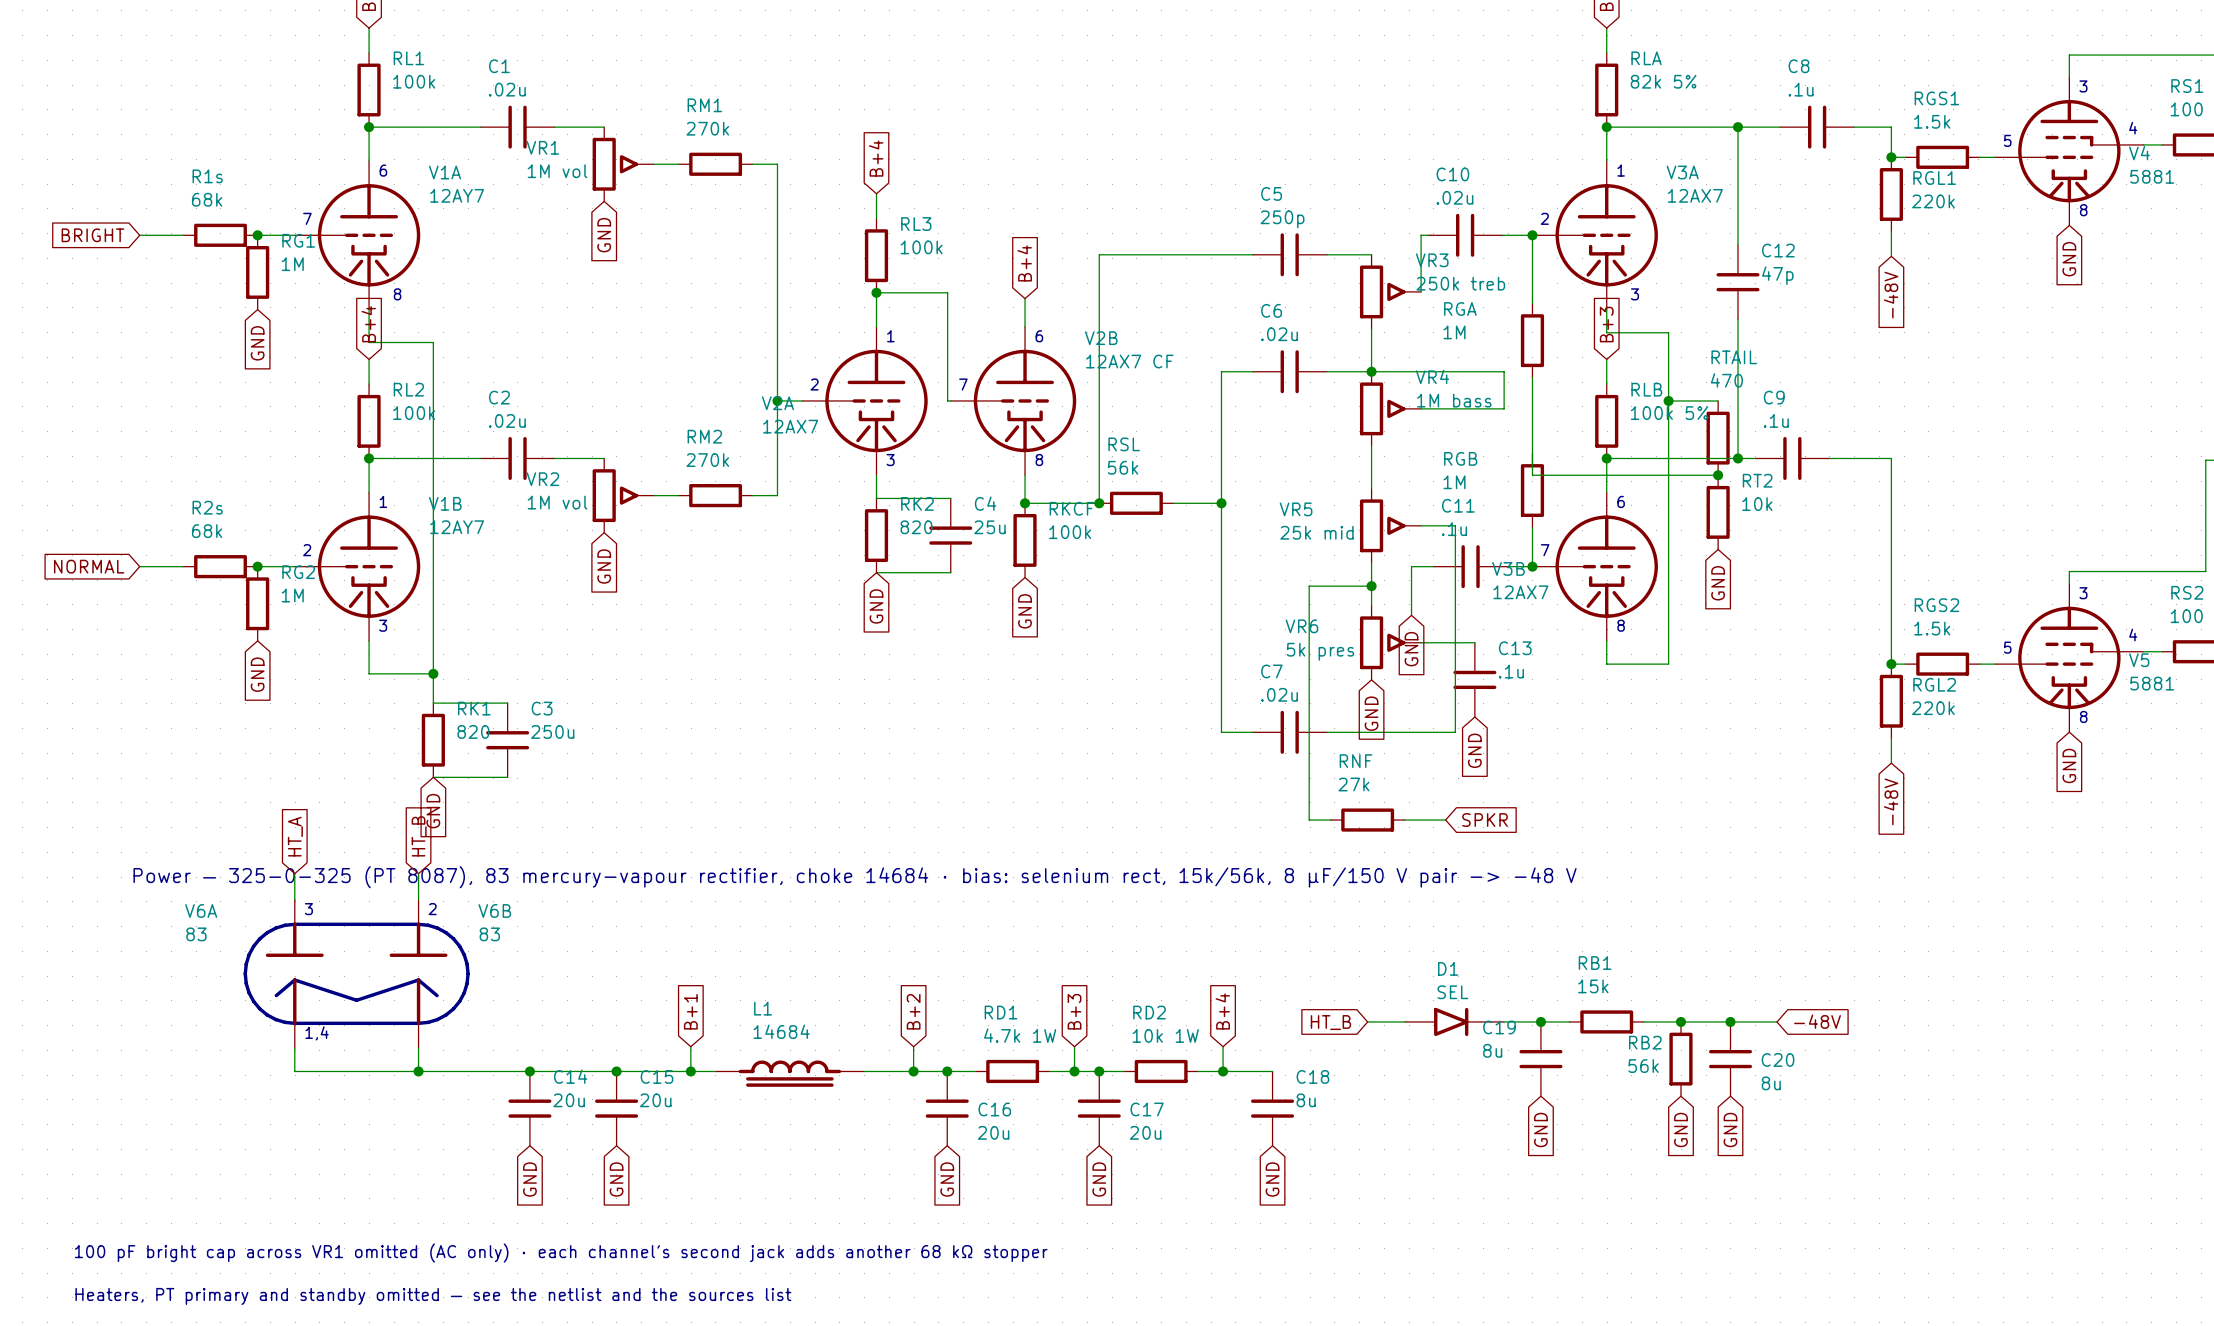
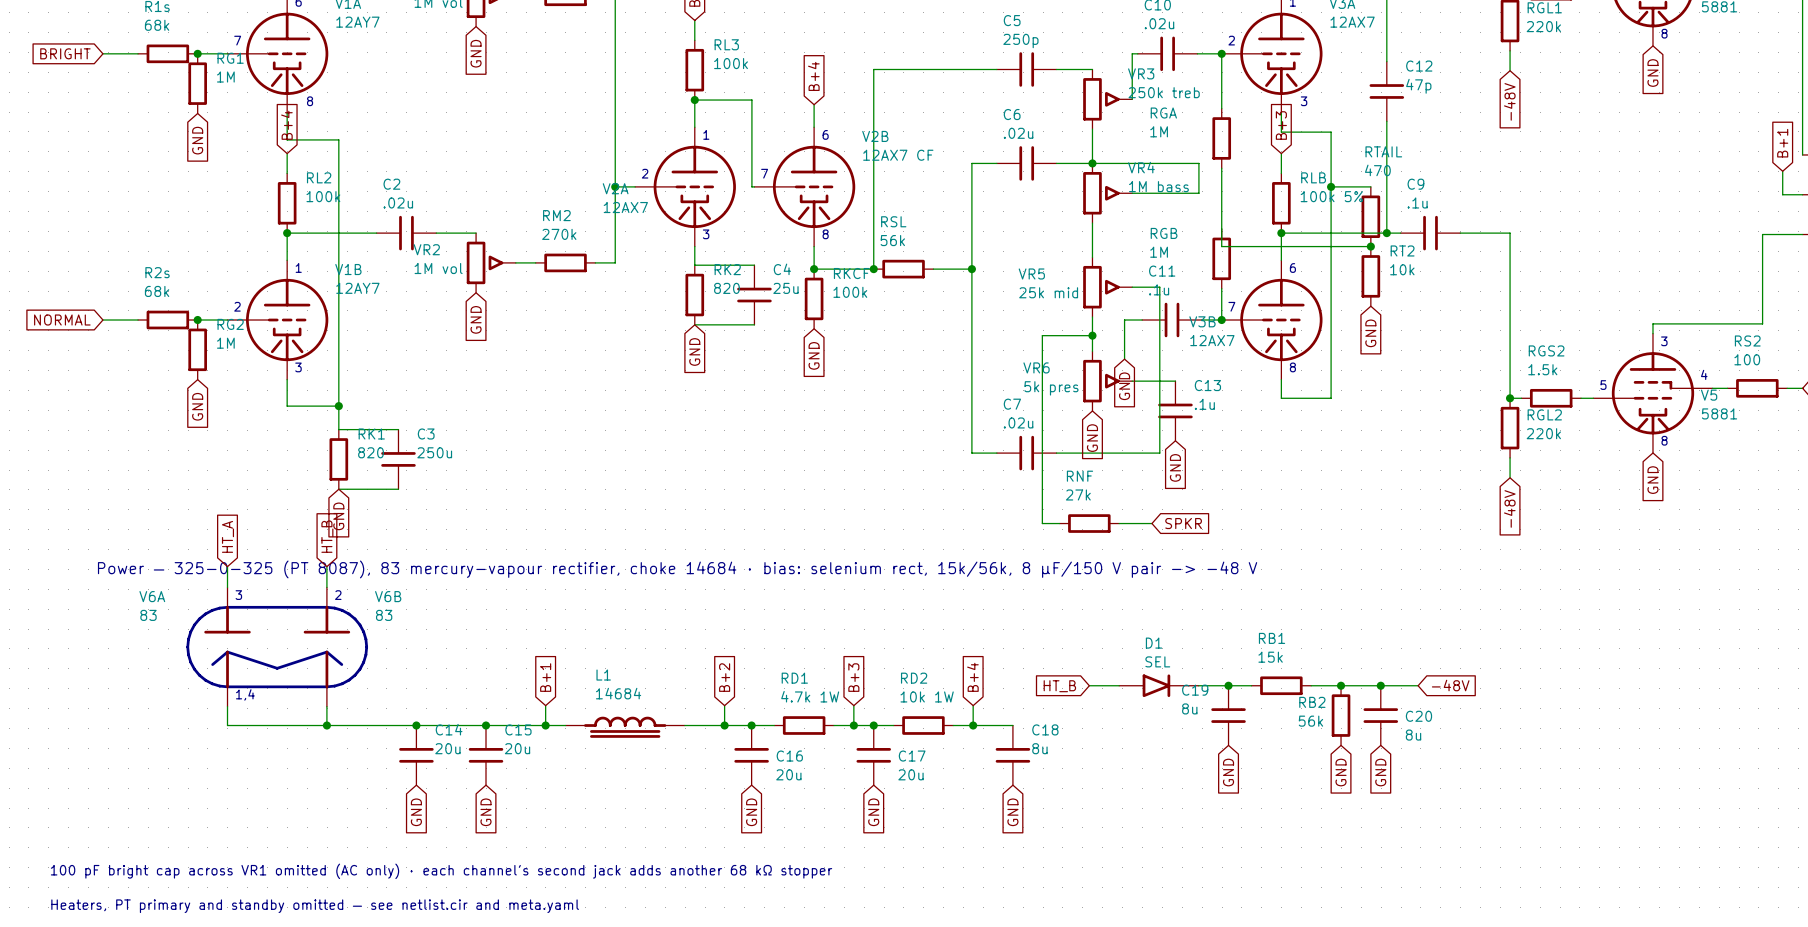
text: Heaters, PT primary and standby omitted — see the netlist and the sources list (433, 1296) -> Heaters, PT primary and standby omitted — see netlist.cir and meta.yaml (315, 906)

